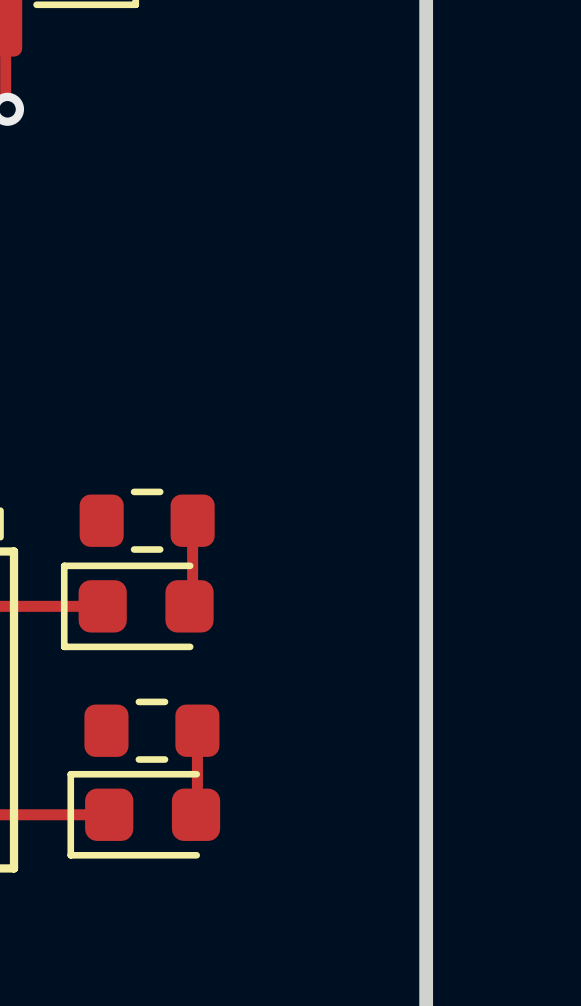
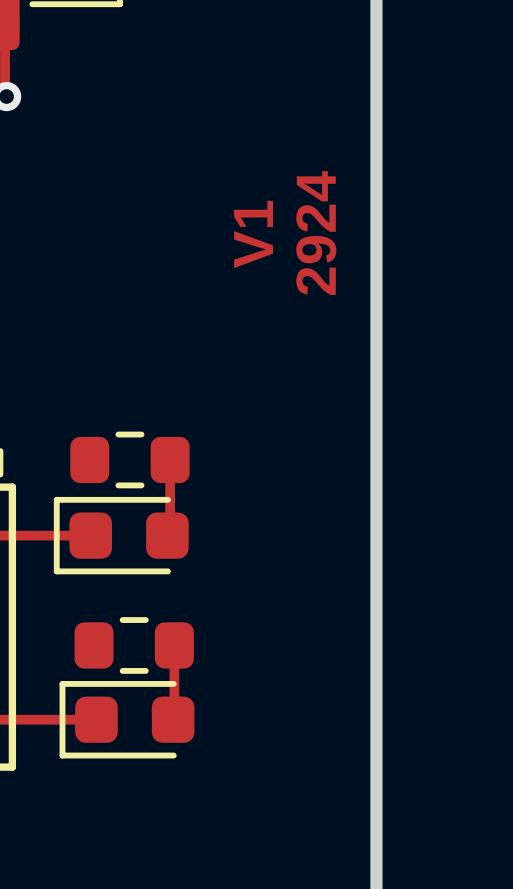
text: none -> 2924 (316, 233)
text: none -> V1 (253, 234)

